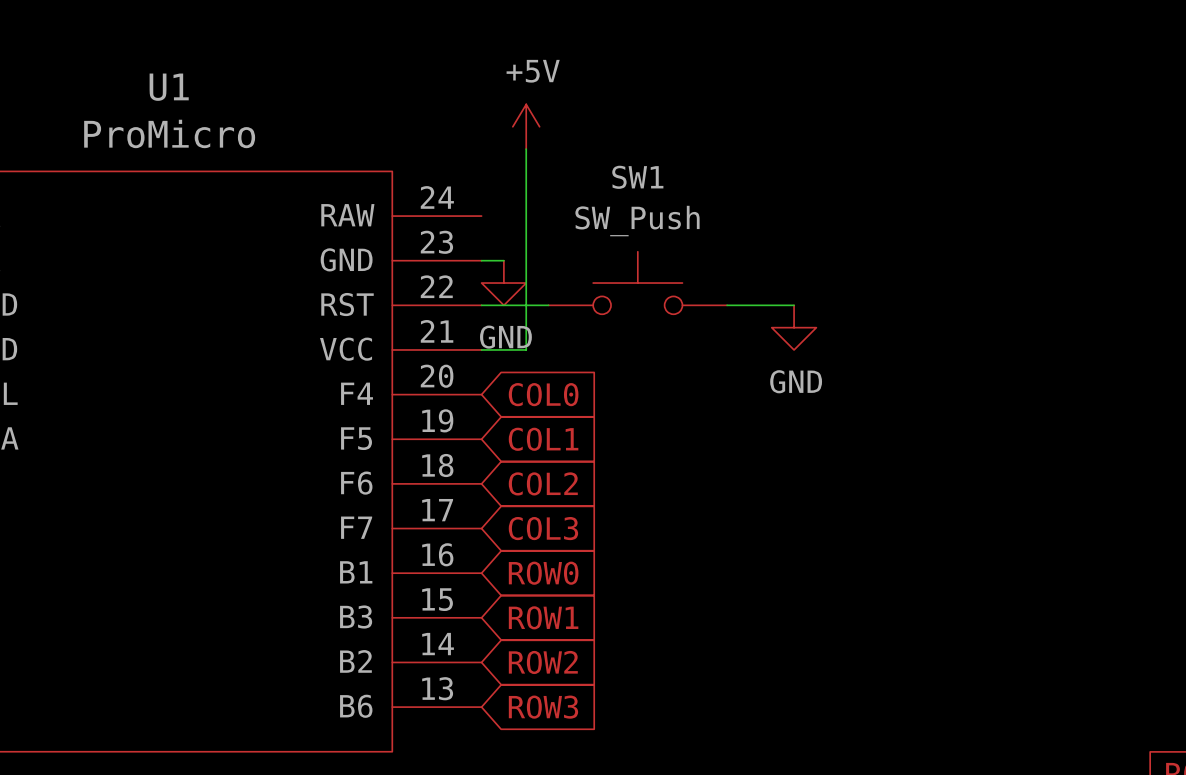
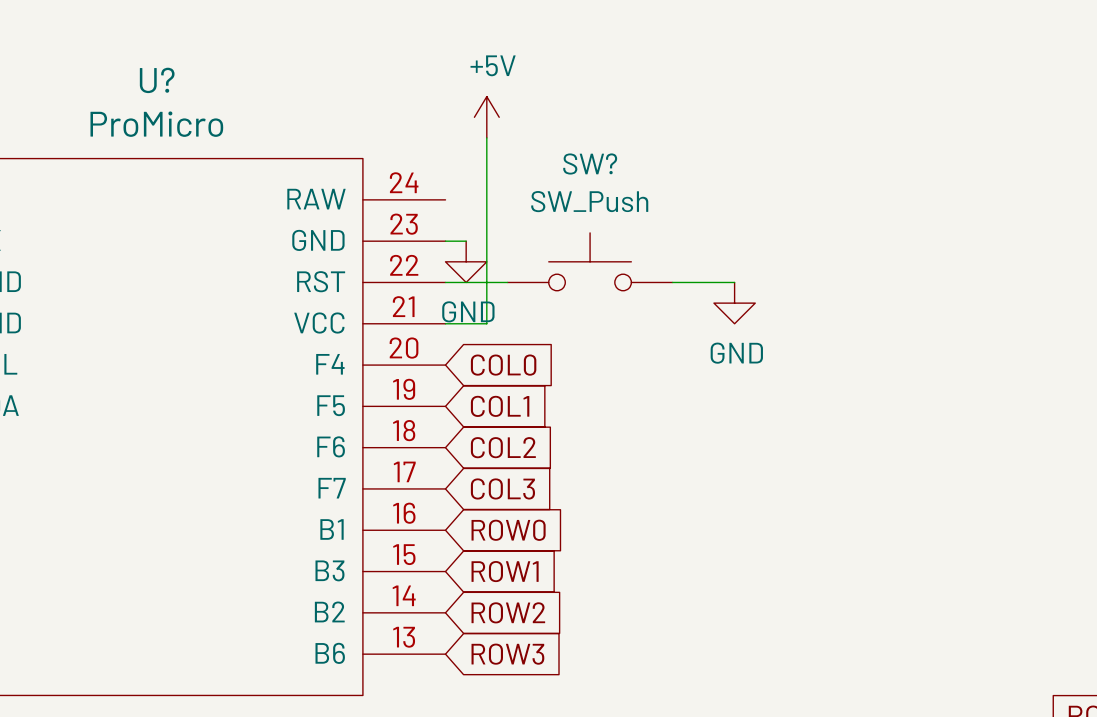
U1 name: U1 (169, 87) -> U? (157, 80)
SW1 name: SW1 (637, 177) -> SW? (590, 163)

